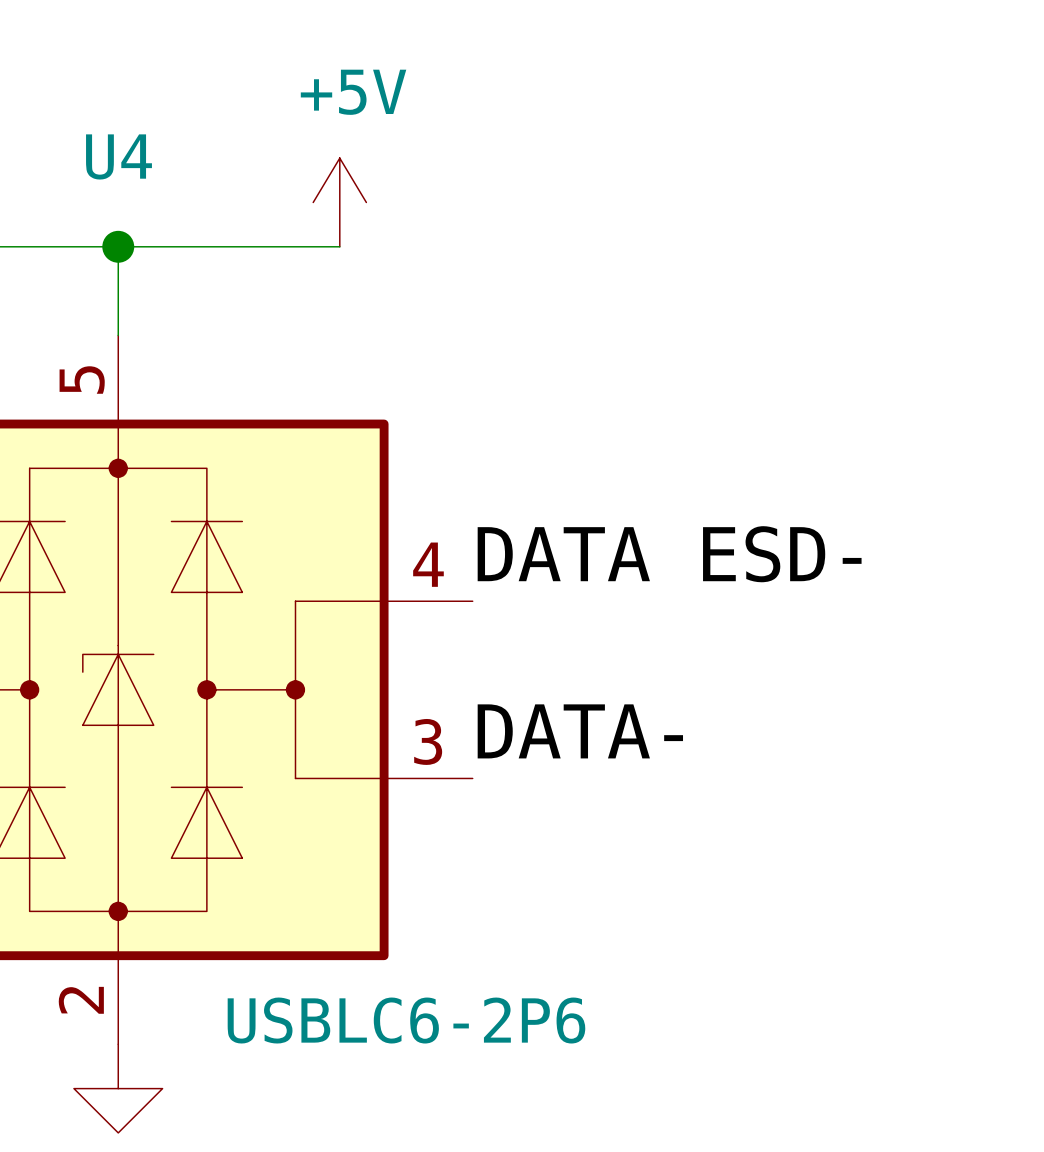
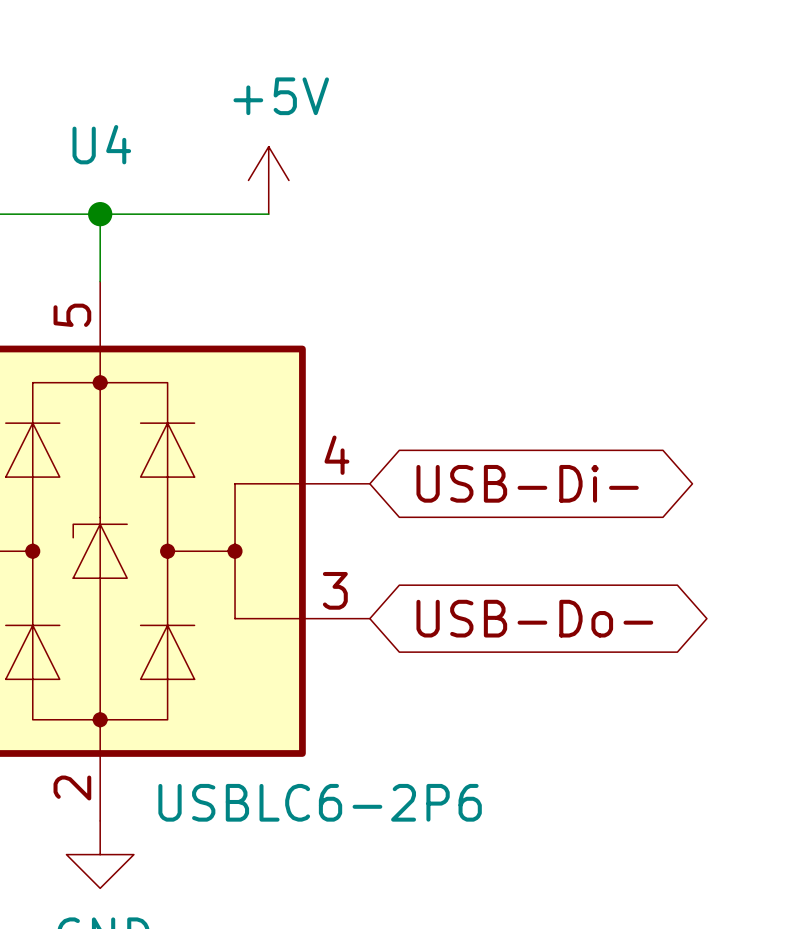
label: DATA ESD- (669, 554) -> none
global label: none -> USB-Di- (527, 483)
label: DATA- (580, 731) -> none
global label: none -> USB-Do- (534, 618)

